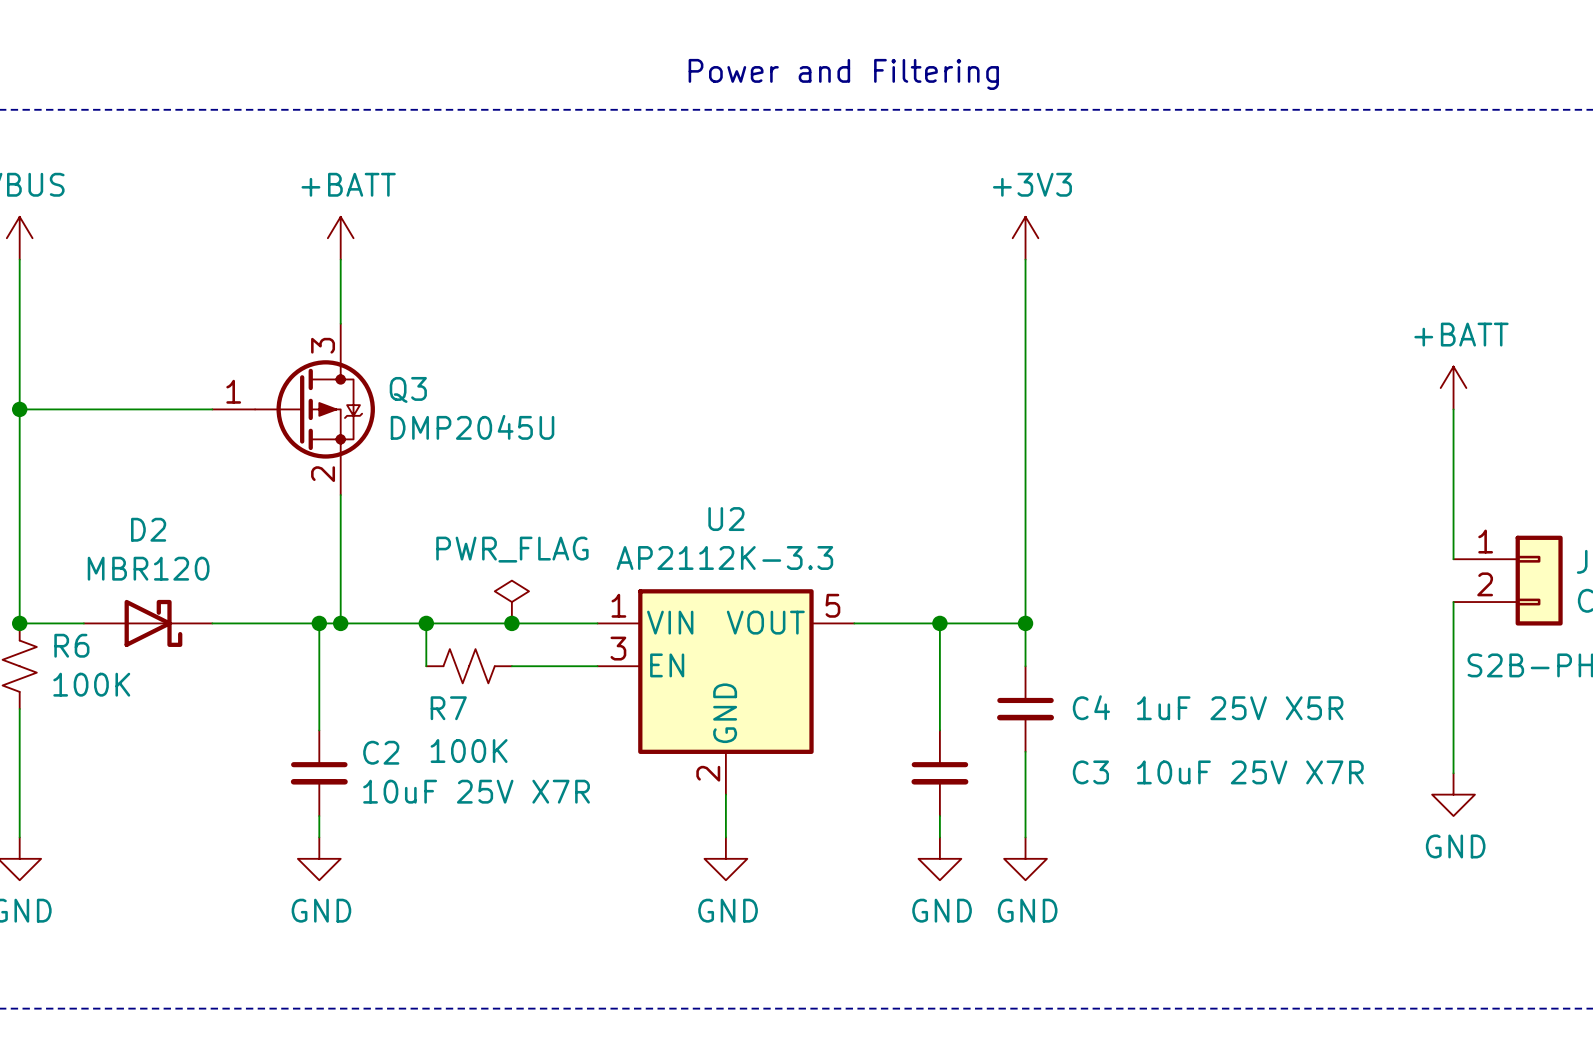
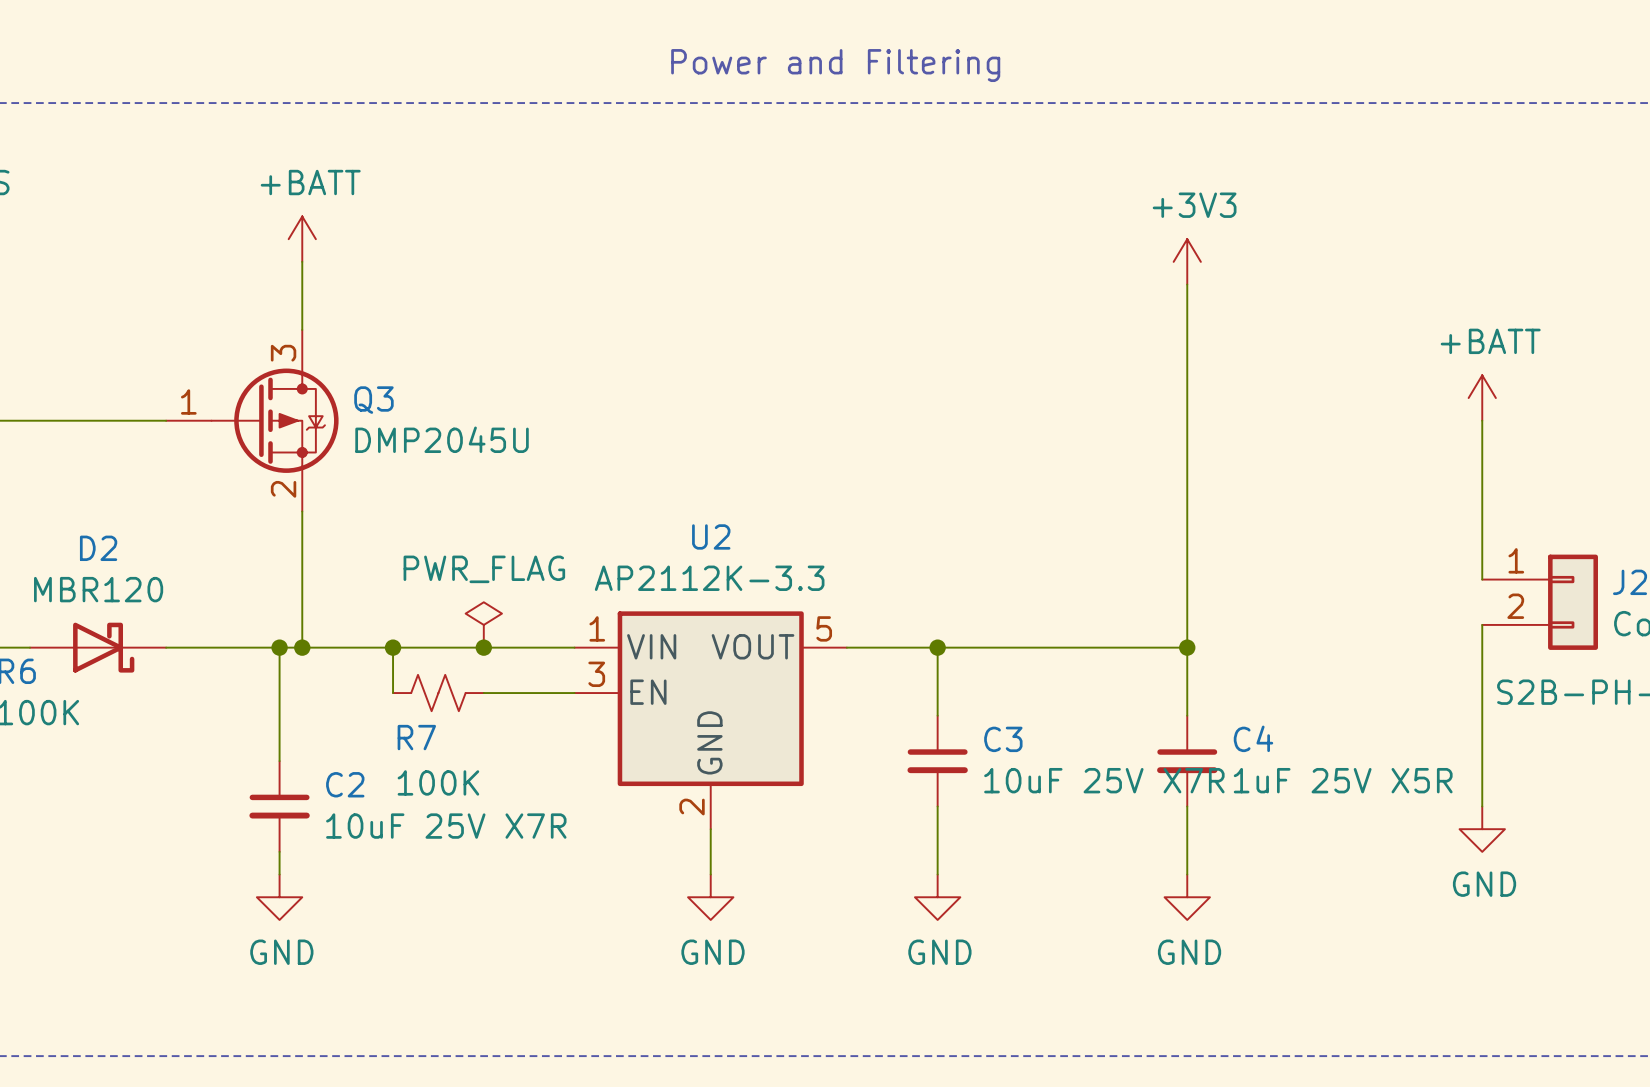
power symbol position: +3V3 (1025, 238) -> +3V3 (1187, 261)
wire: (1025, 259) (1025, 666) -> (1187, 284) (1187, 715)
wire: none -> (1028, 647) (1187, 647)
junction: (1025, 623) -> none
junction: none -> (1187, 647)
C4 name position: C4 (1091, 707) -> C4 (1253, 738)
C4 value position: 1uF 25V X5R (1240, 708) -> 1uF 25V X5R (1343, 780)
C4 position: (1025, 709) -> (1187, 761)
wire: (1025, 751) (1025, 837) -> none
C3 name position: C3 (1090, 772) -> C3 (1003, 739)
C3 value position: 10uF 25V X7R (1250, 772) -> 10uF 25V X7R (1104, 780)
C3 position: (939, 773) -> (937, 761)
wire: none -> (1187, 806) (1187, 874)
power symbol position: GND (1025, 858) -> GND (1187, 897)

